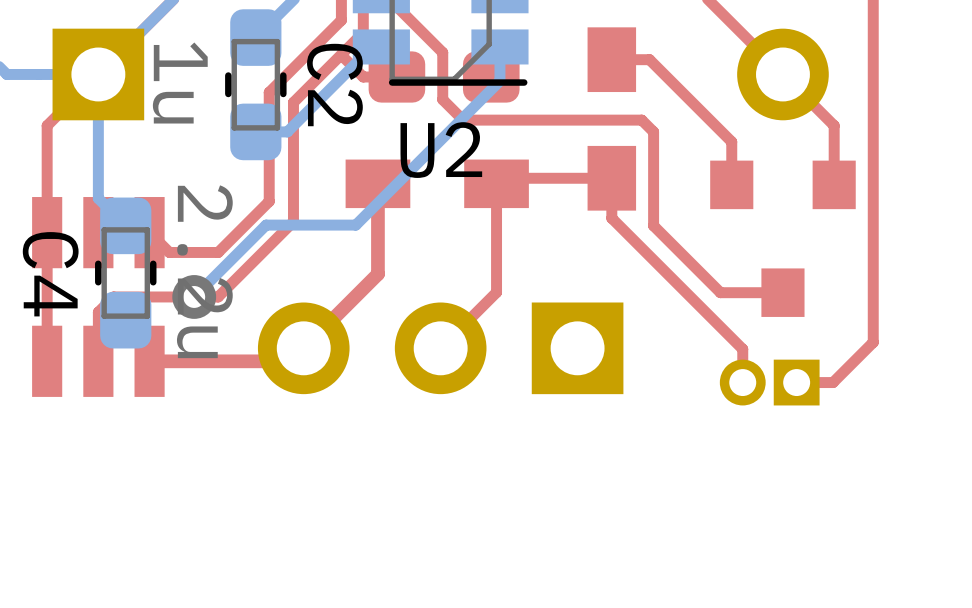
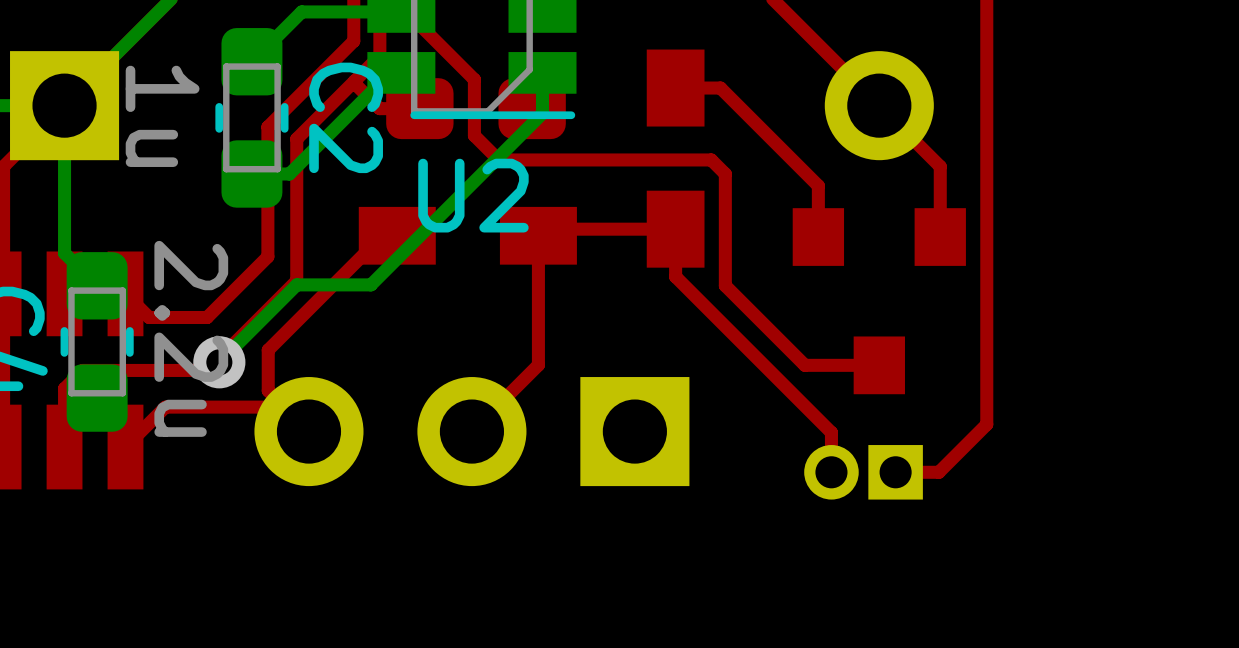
top track: (377, 183) (377, 274) (290, 361) (149, 361) -> (397, 235) (382, 235) (268, 350) (268, 390) (308, 431)
bottom track: (293, 225) (266, 225) (194, 296) -> (296, 284) (219, 362)
via position: (194, 296) -> (219, 362)
top track: none -> (284, 407) (165, 407) (125, 447)

